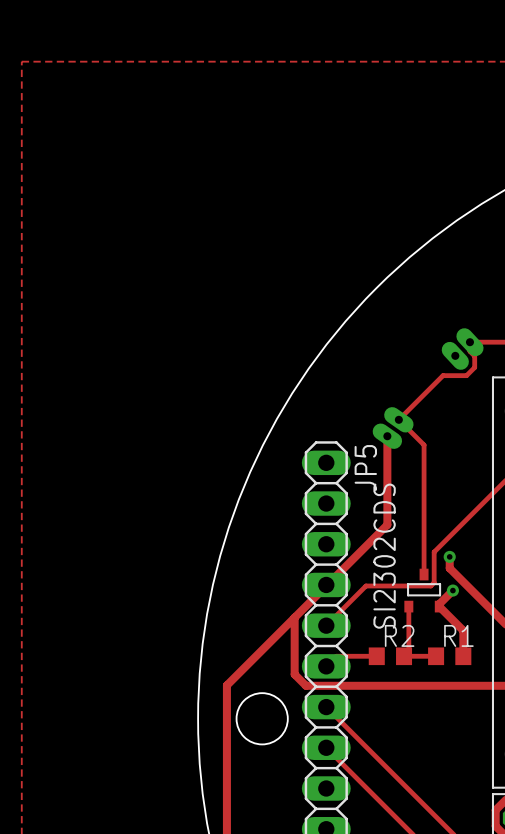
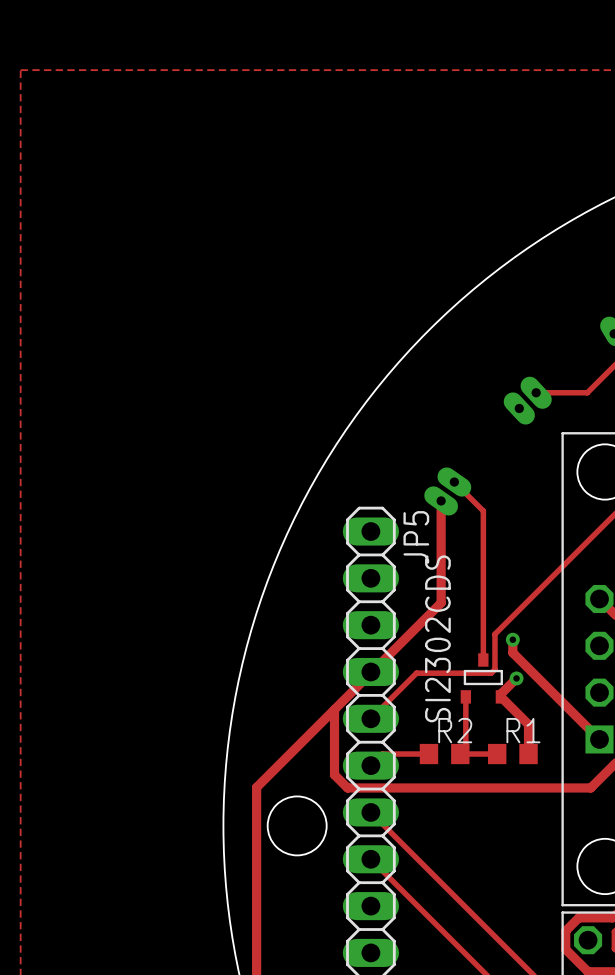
track: (469, 342) (469, 351) (474, 356) (474, 367) (466, 375) (443, 375) (398, 419) -> none

